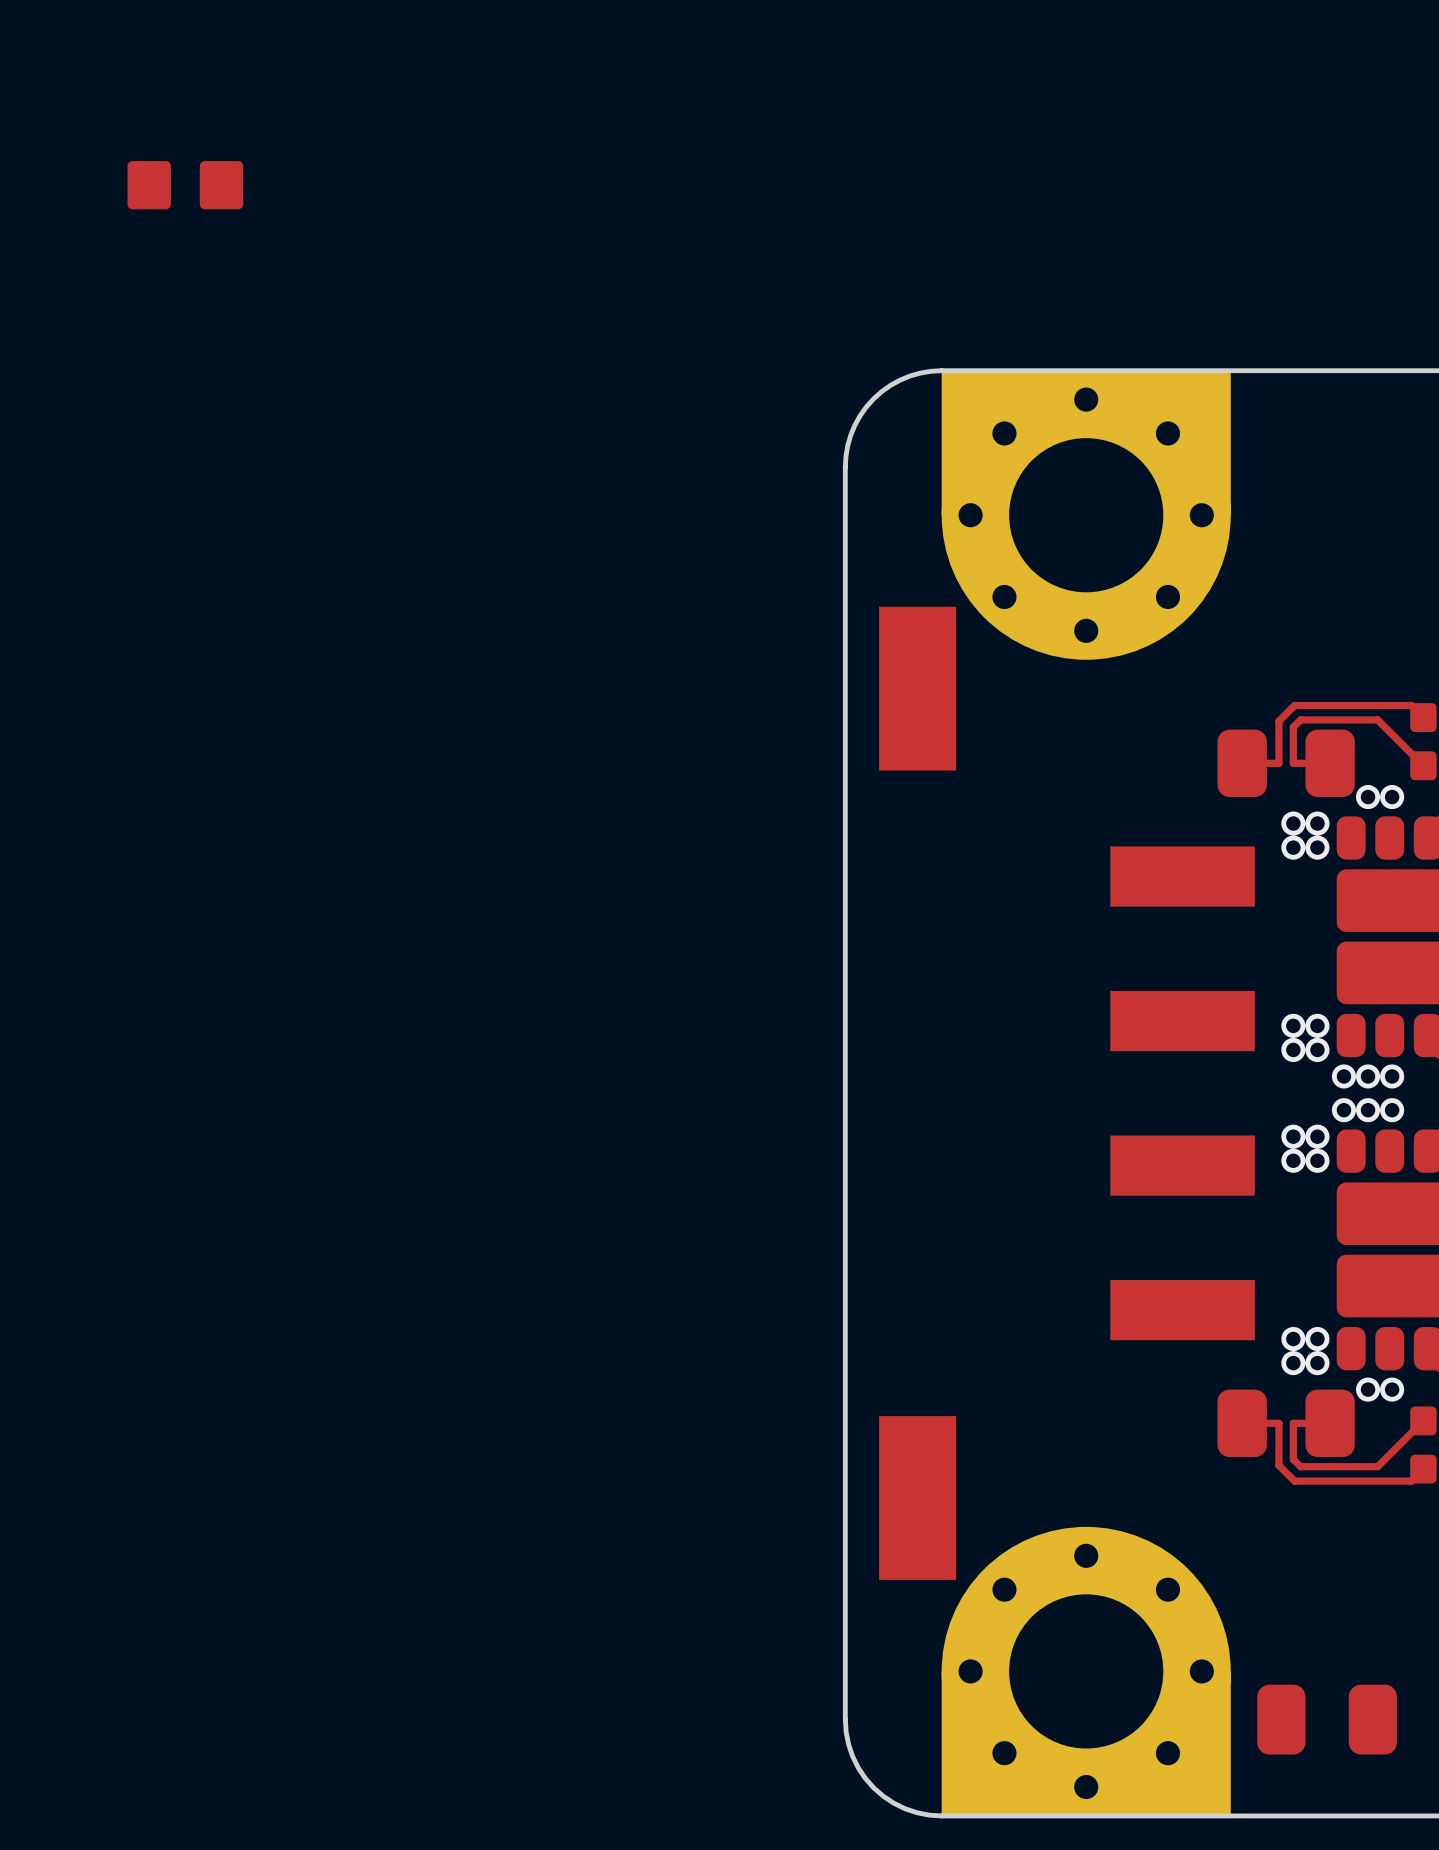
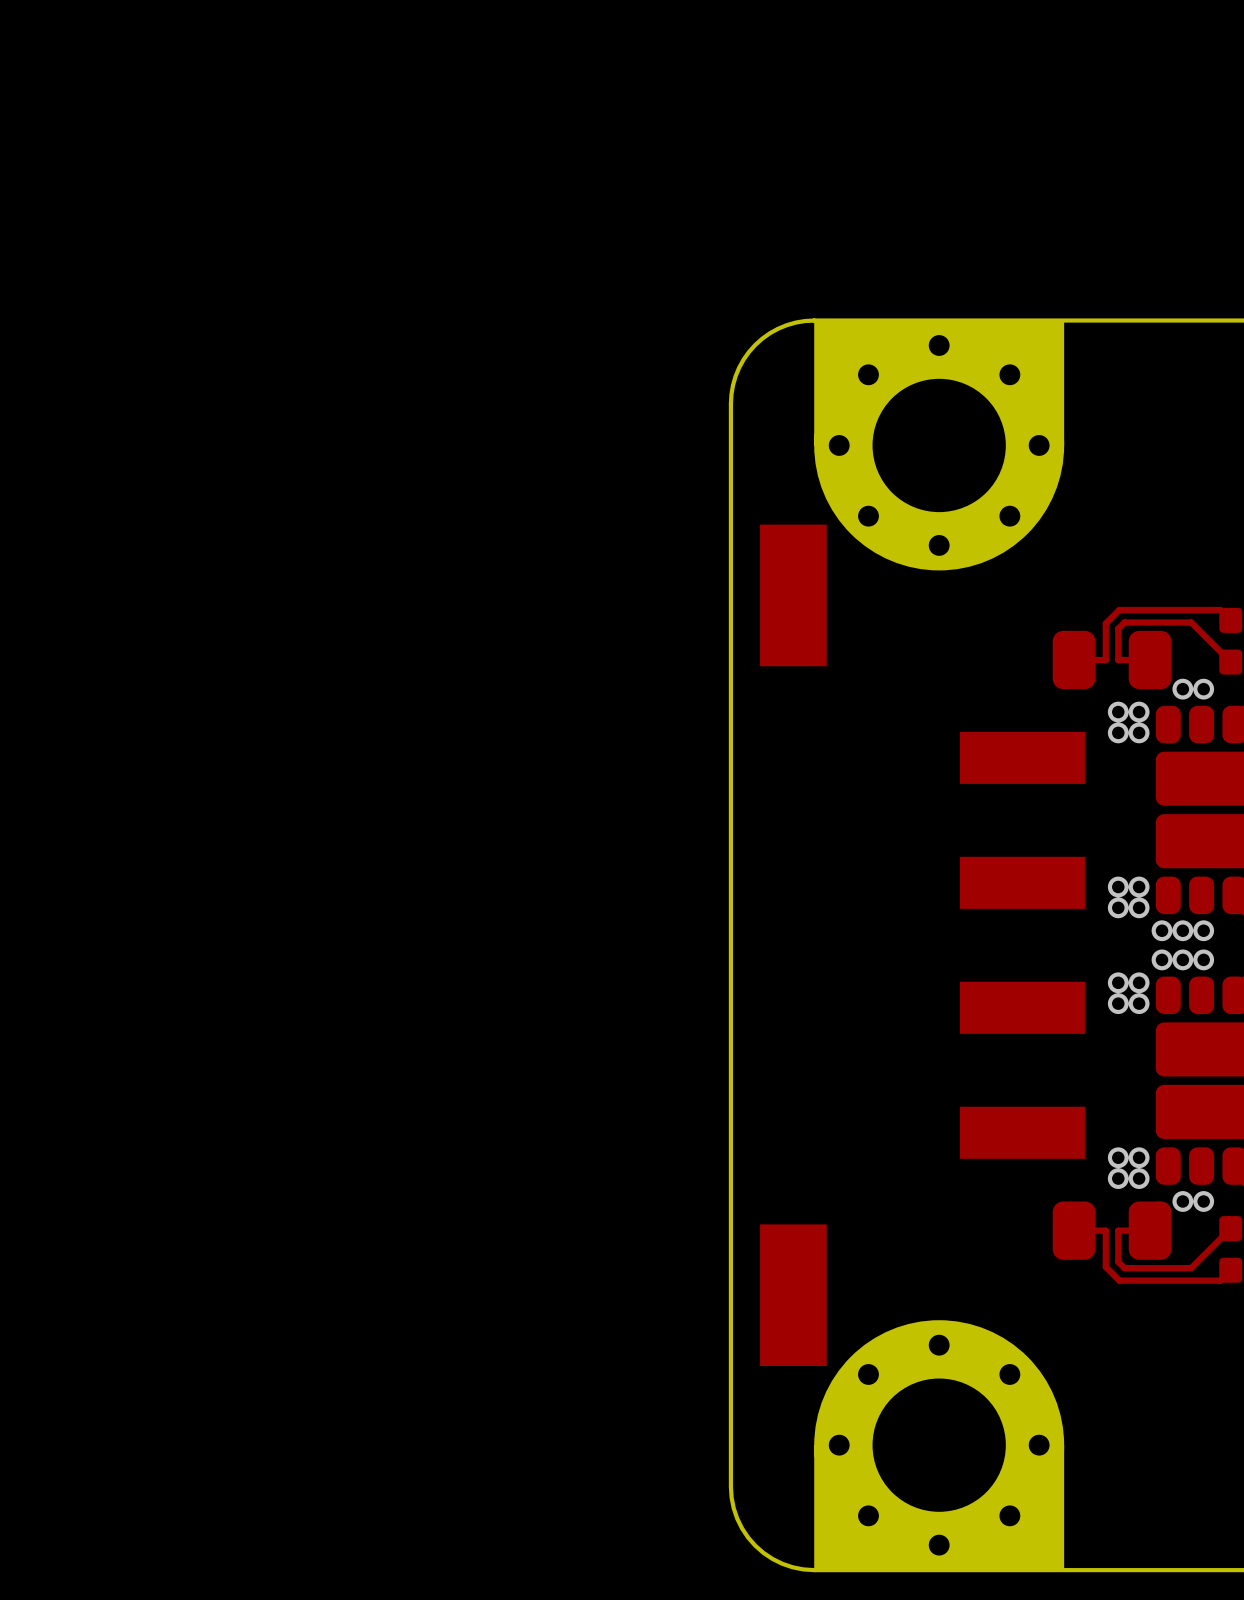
part: (185, 185) -> none
part: (1327, 1719) -> none

